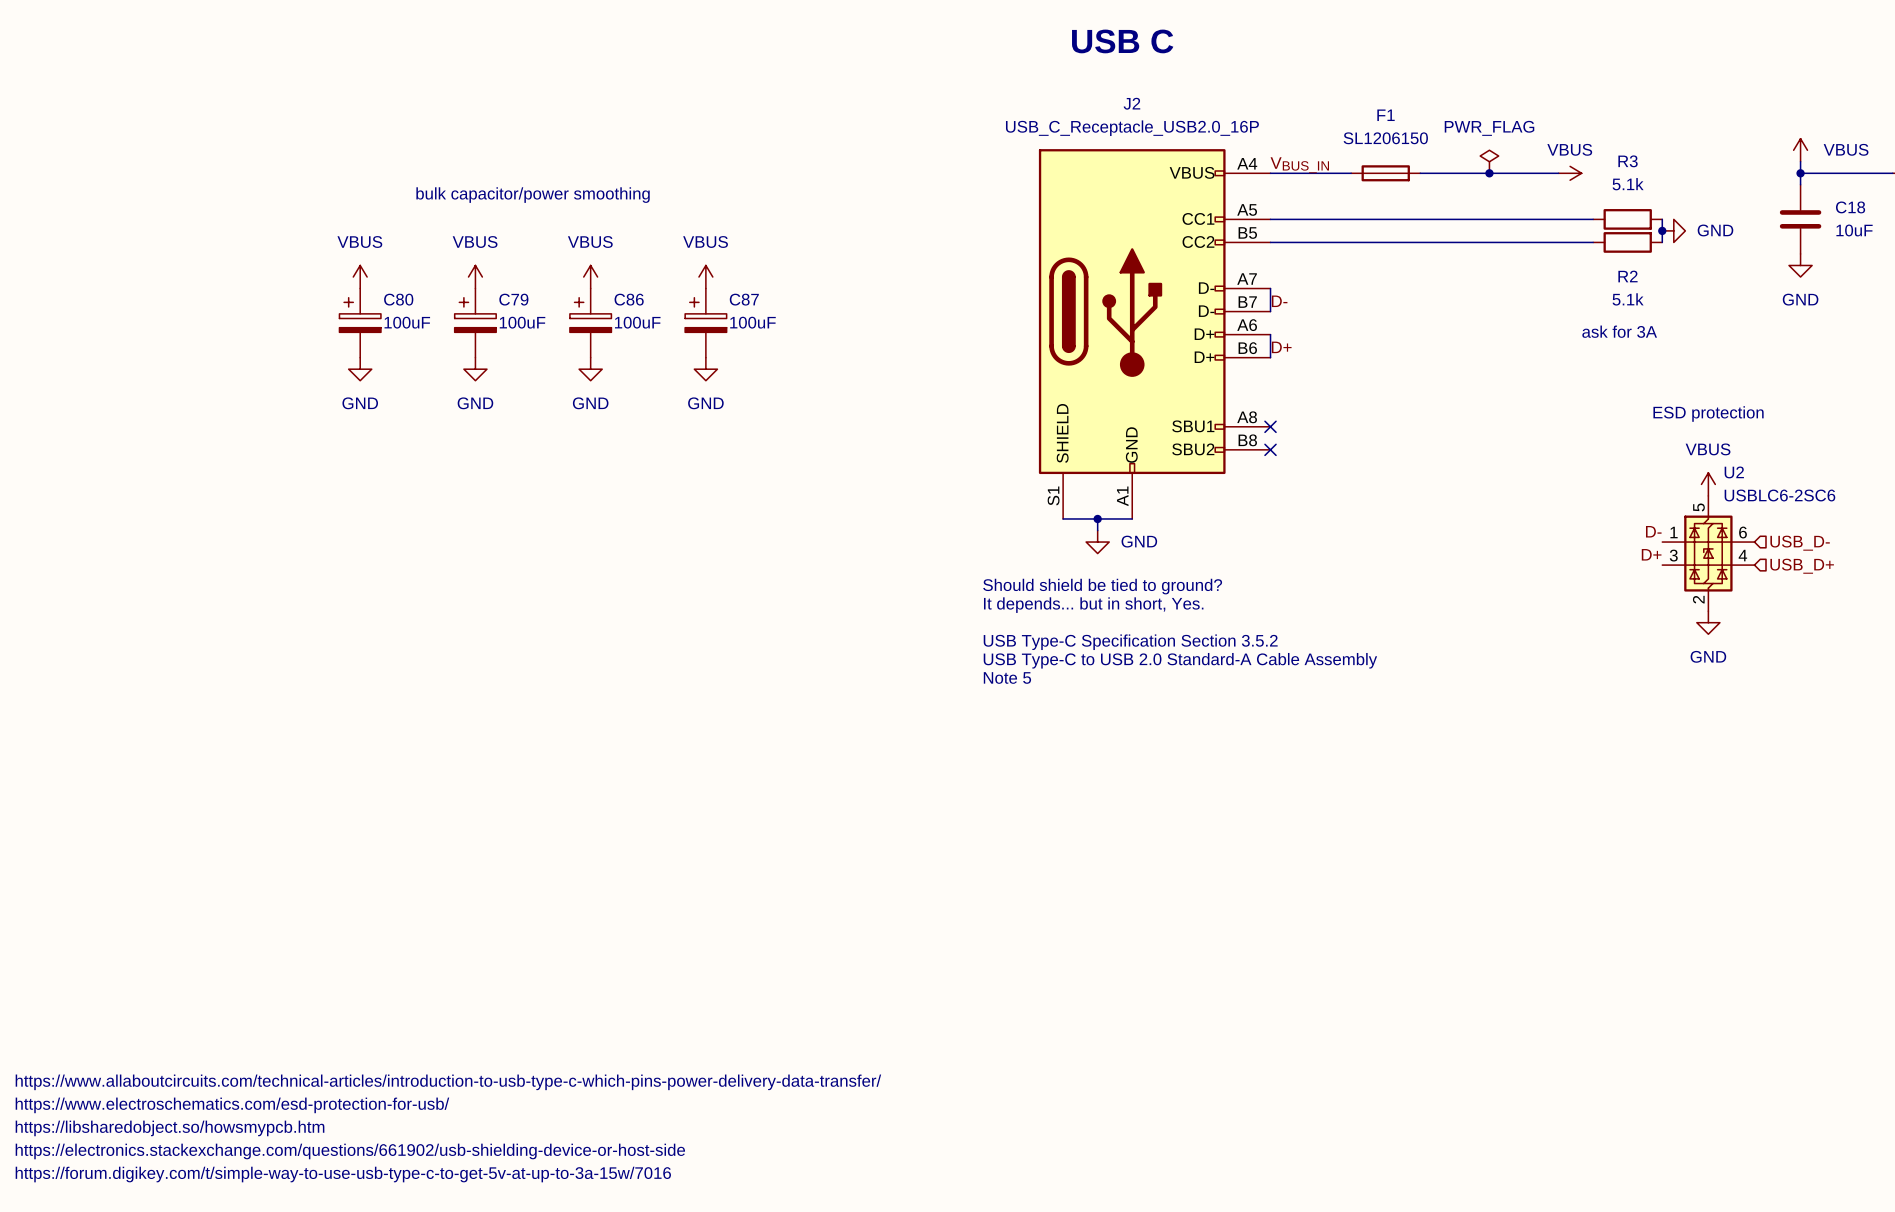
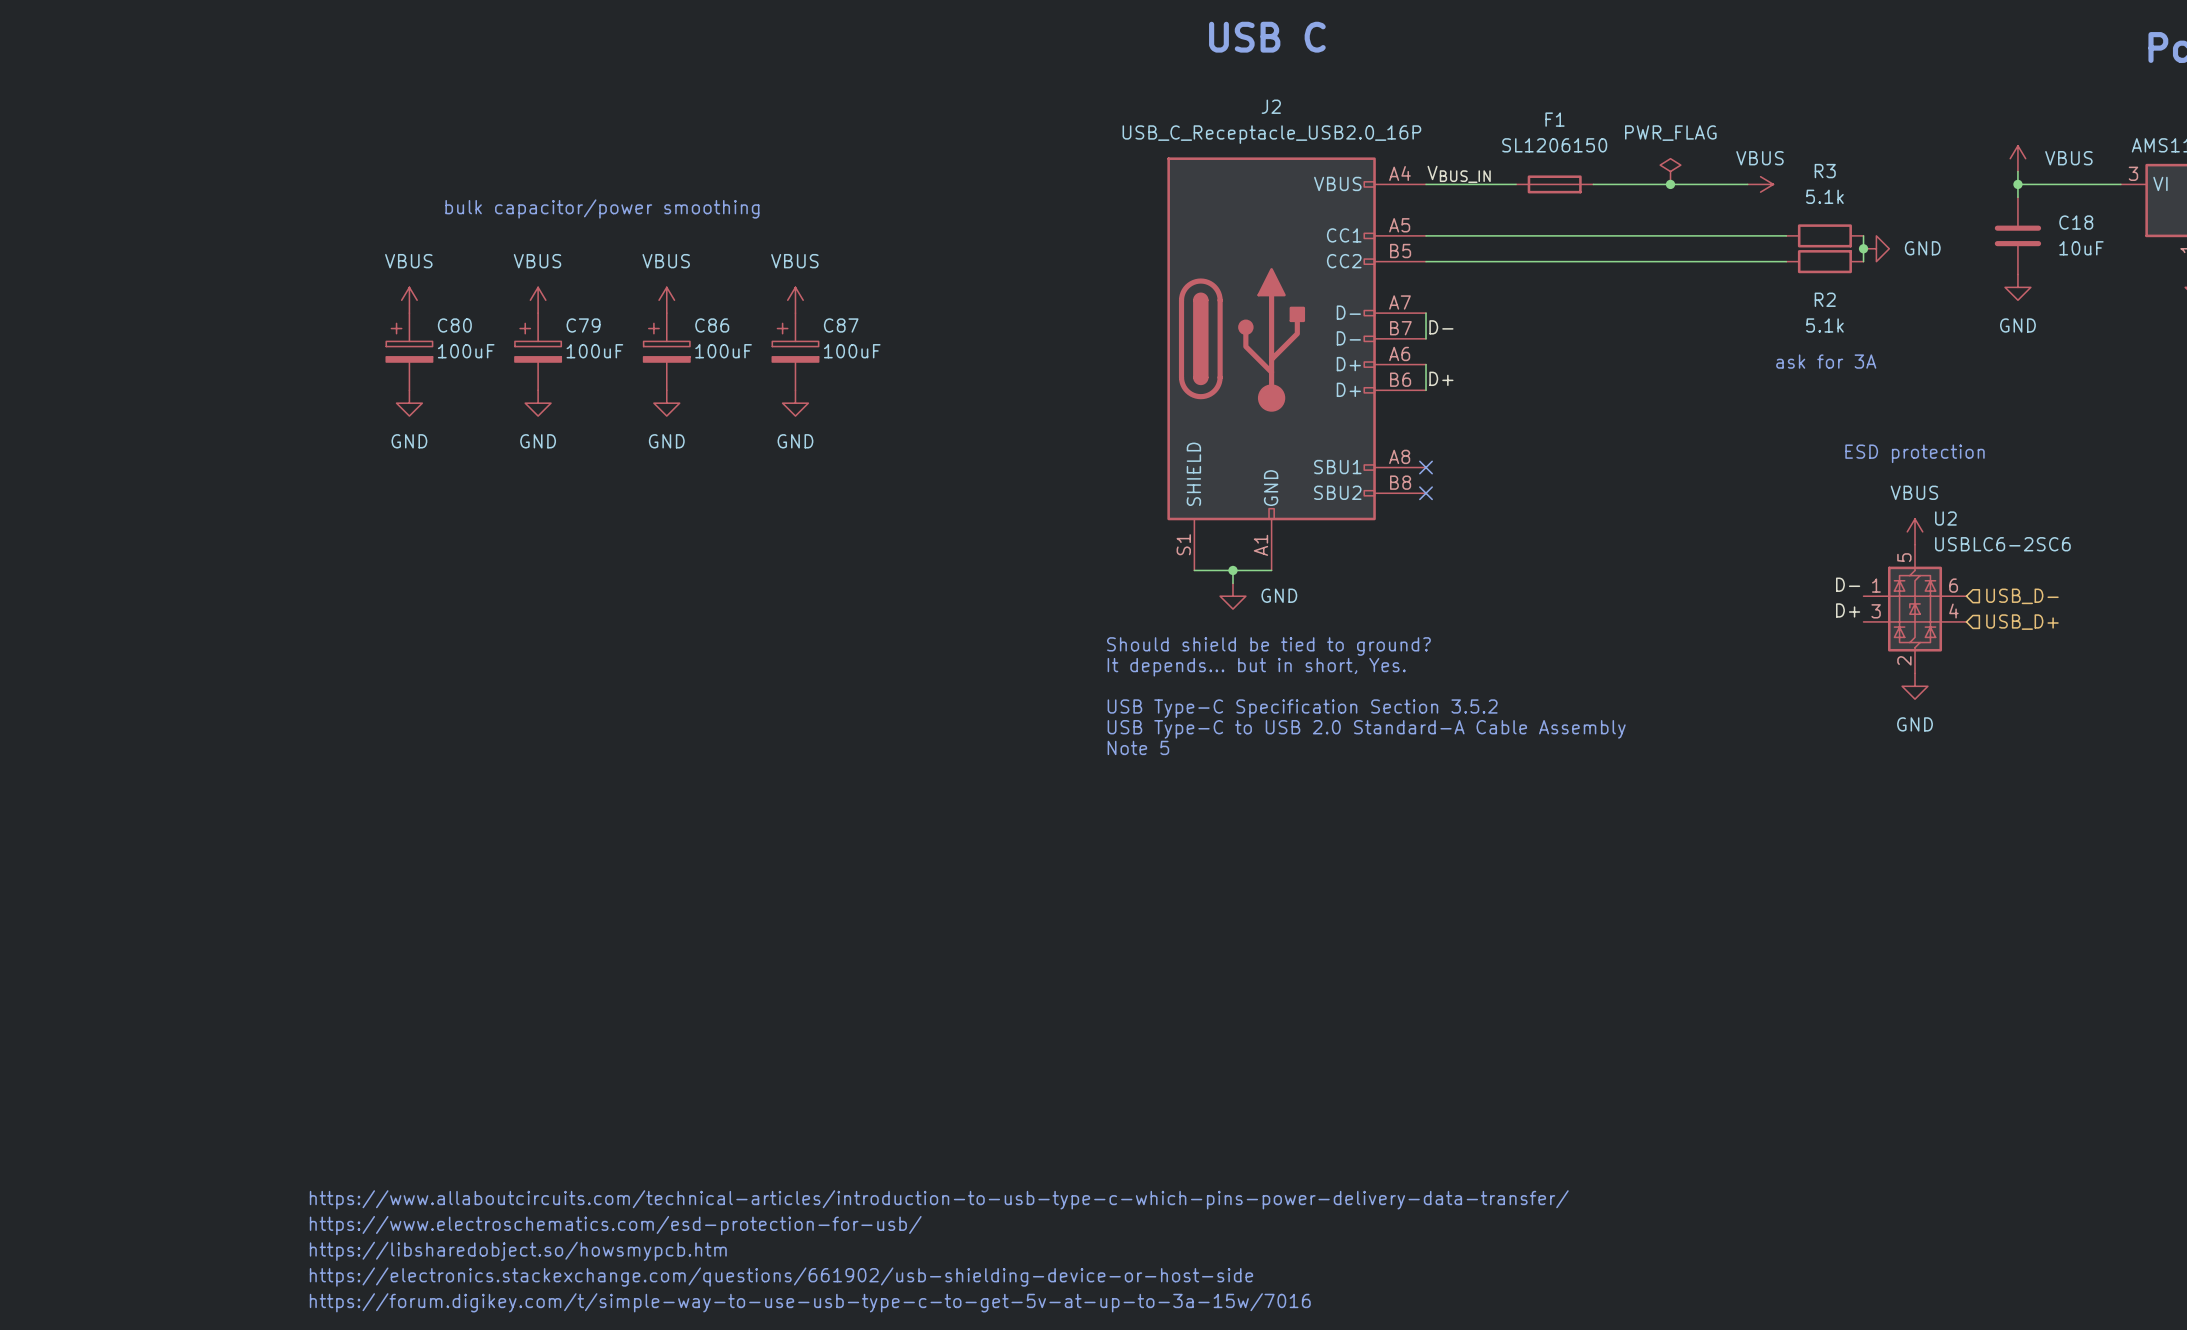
text: https://www.allaboutcircuits.com/technical-articles/introduction-to-usb-type-c-which-pins-power-delivery-data-transfer/ (448, 1082) -> none
text: none -> https://www.allaboutcircuits.com/technical-articles/introduction-to-usb-type-c-which-pins-power-delivery-data-transfer/ (939, 1199)
text: https://www.electroschematics.com/esd-protection-for-usb/ (232, 1105) -> none
text: none -> https://www.electroschematics.com/esd-protection-for-usb/ (615, 1225)
text: https://libsharedobject.so/howsmypcb.htm (170, 1128) -> none
text: none -> https://libsharedobject.so/howsmypcb.htm (518, 1251)
text: https://electronics.stackexchange.com/questions/661902/usb-shielding-device-or-host-side (350, 1151) -> none
text: none -> https://electronics.stackexchange.com/questions/661902/usb-shielding-device-or-host-side (781, 1277)
text: https://forum.digikey.com/t/simple-way-to-use-usb-type-c-to-get-5v-at-up-to-3a-15w/7016 (343, 1174) -> none
text: none -> https://forum.digikey.com/t/simple-way-to-use-usb-type-c-to-get-5v-at-up-to-3a-15w/7016 (810, 1302)

